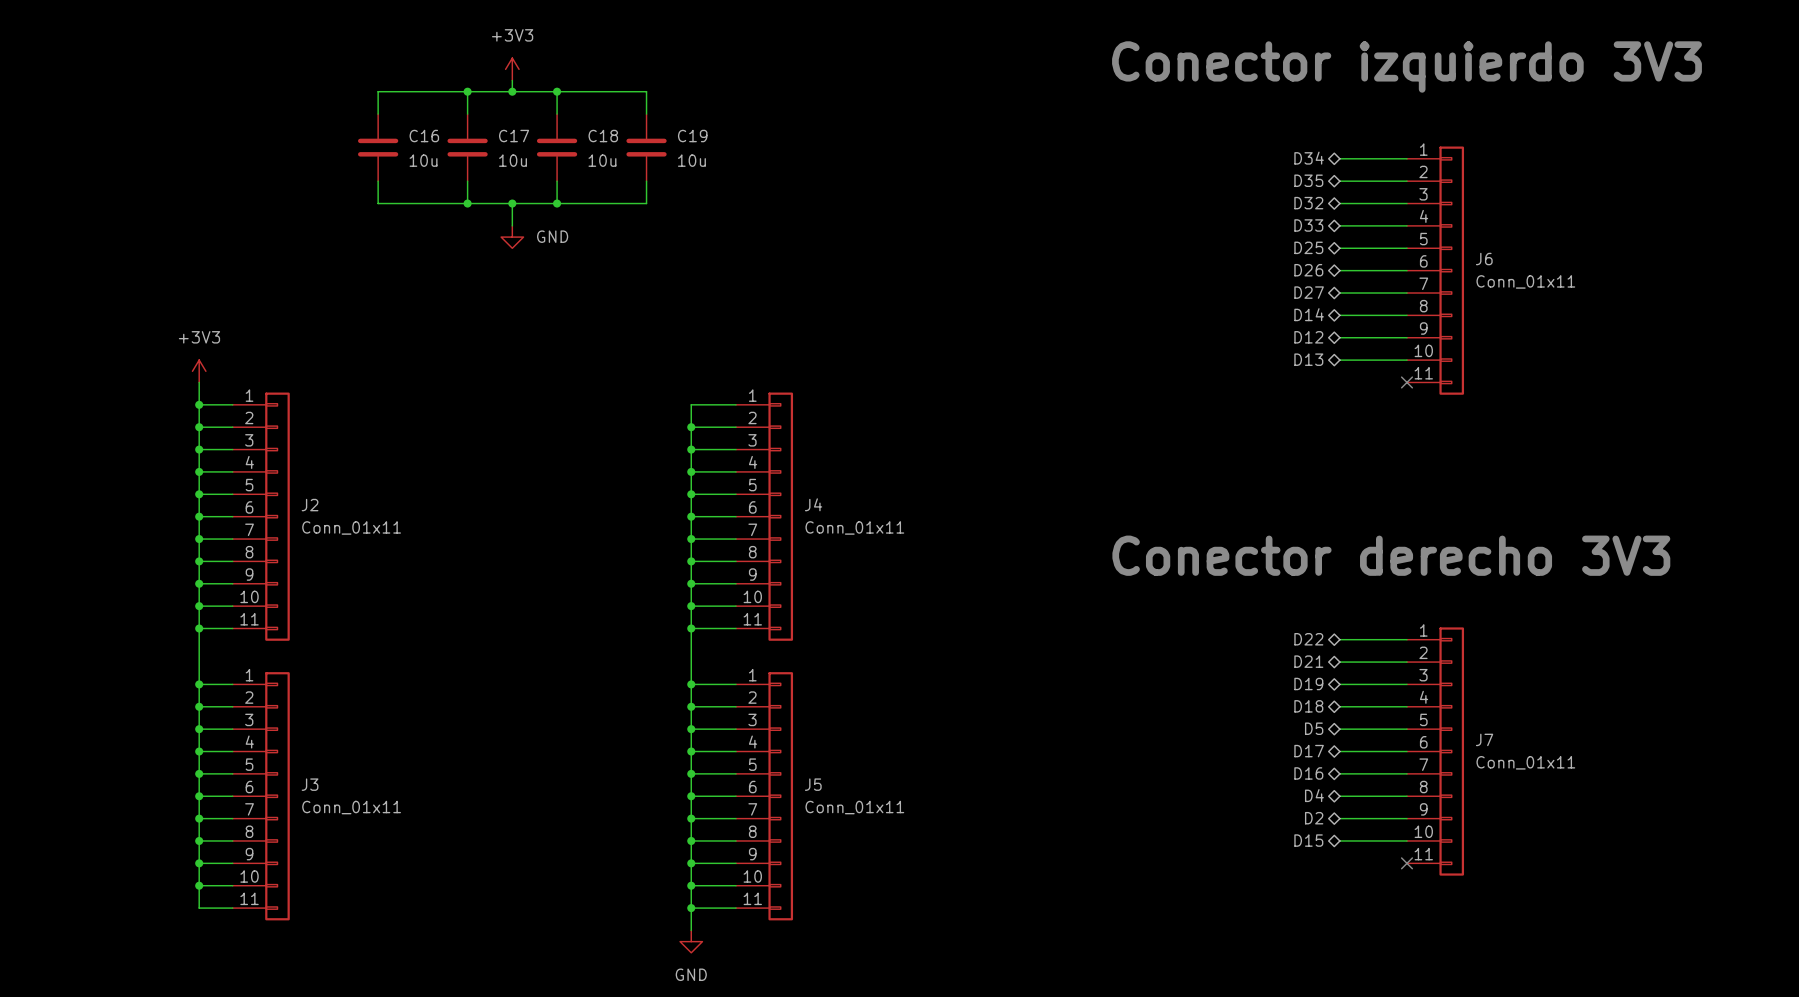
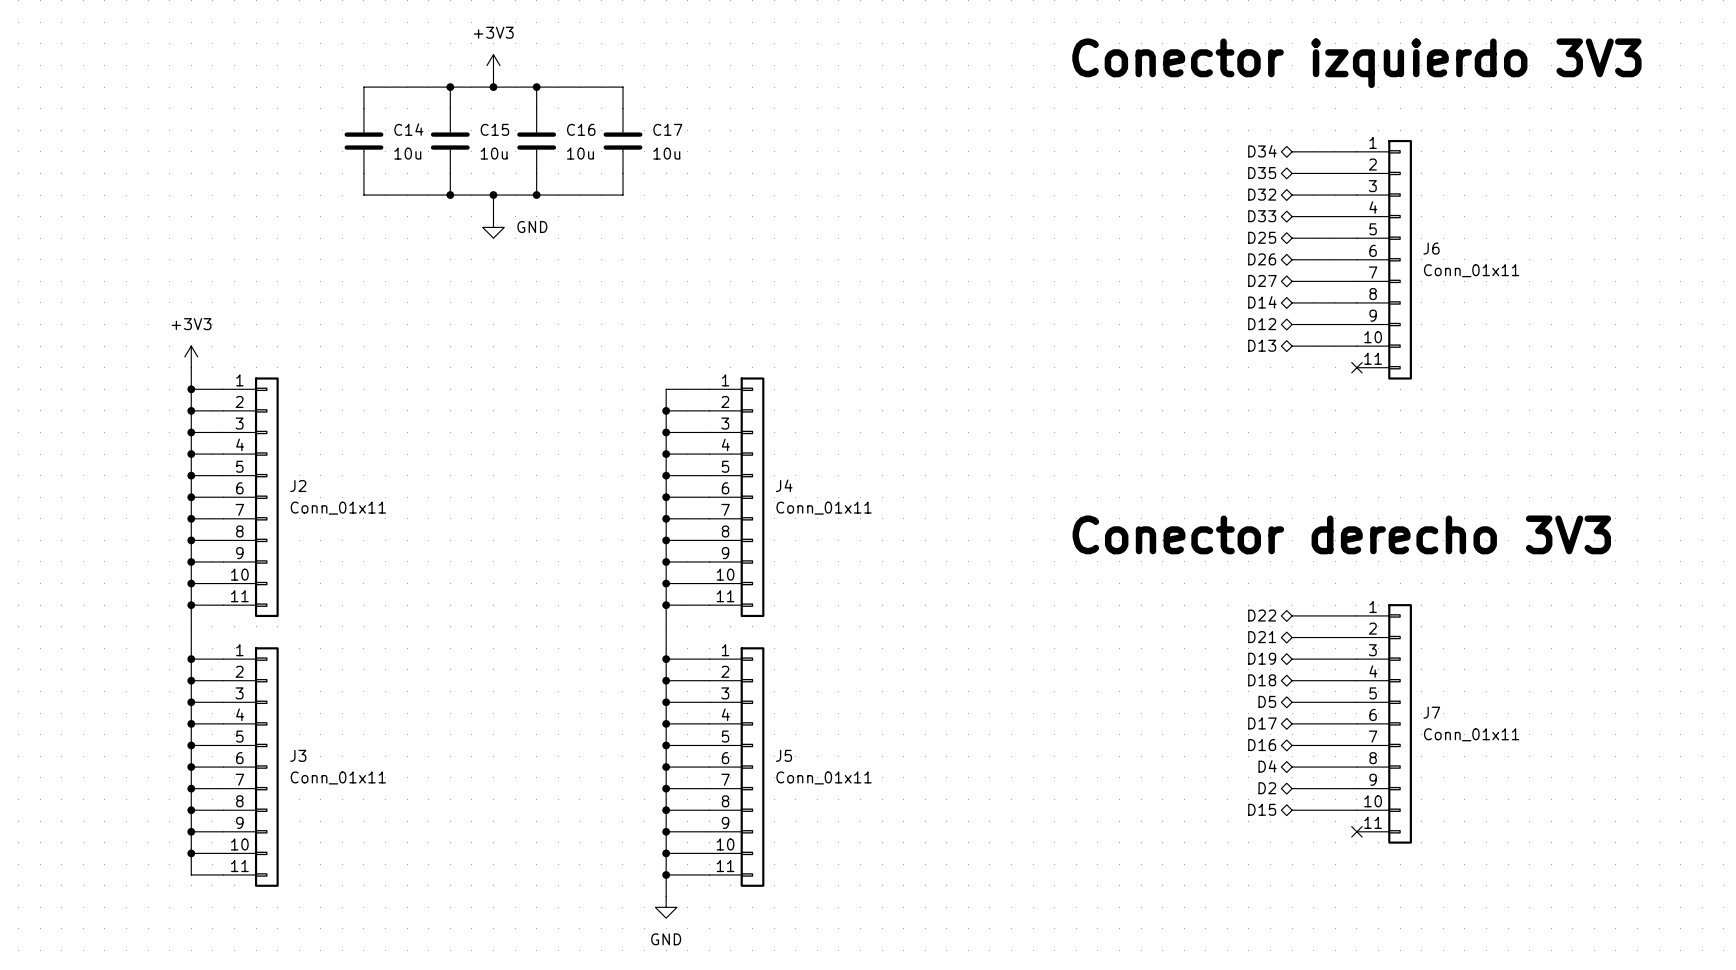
C16 name: C16 (424, 136) -> C14 (408, 129)
C17 name: C17 (514, 136) -> C15 (494, 129)
C18 name: C18 (603, 136) -> C16 (581, 129)
C19 name: C19 (692, 136) -> C17 (667, 129)

